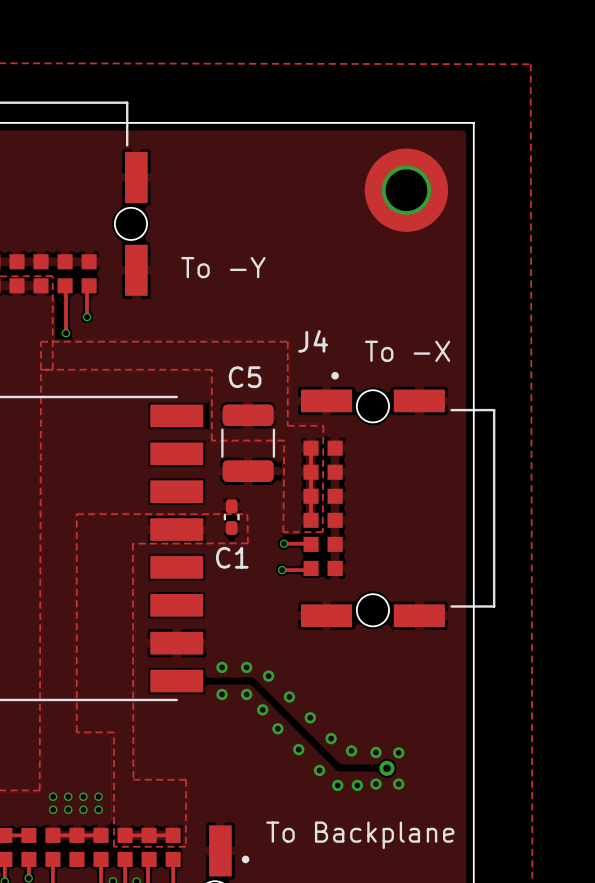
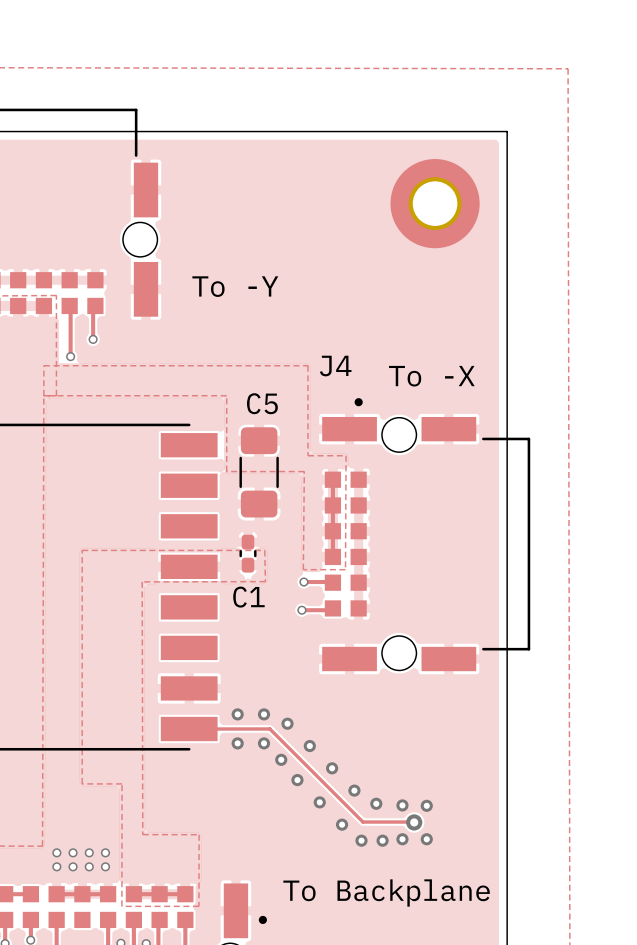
C5 footprint: [221, 404, 276, 483] -> [239, 427, 279, 518]
track: none -> (189, 728) (269, 728) (362, 822) (413, 822)

